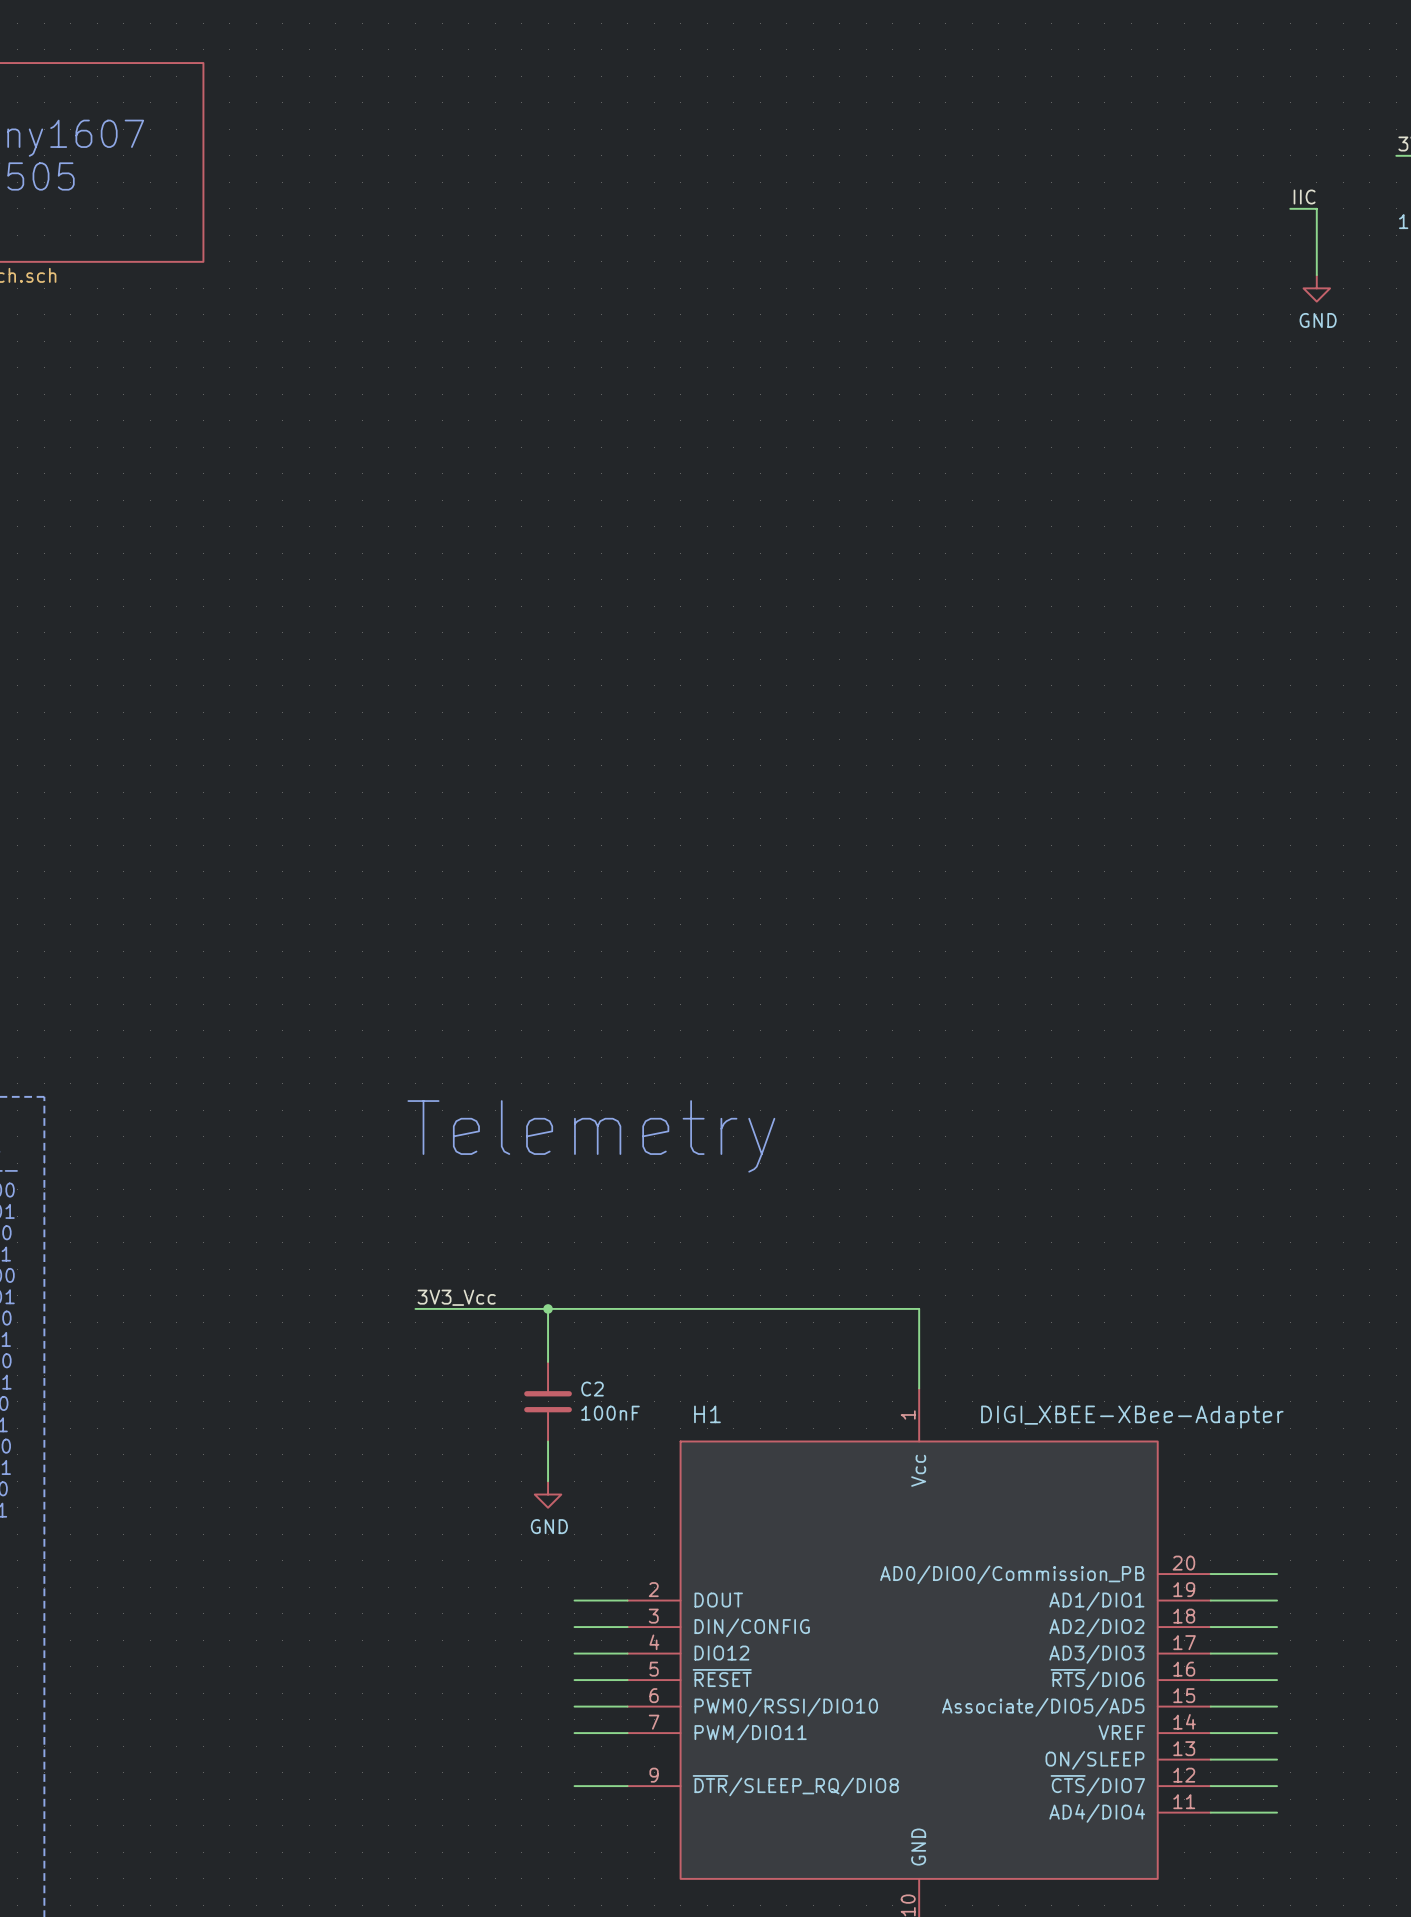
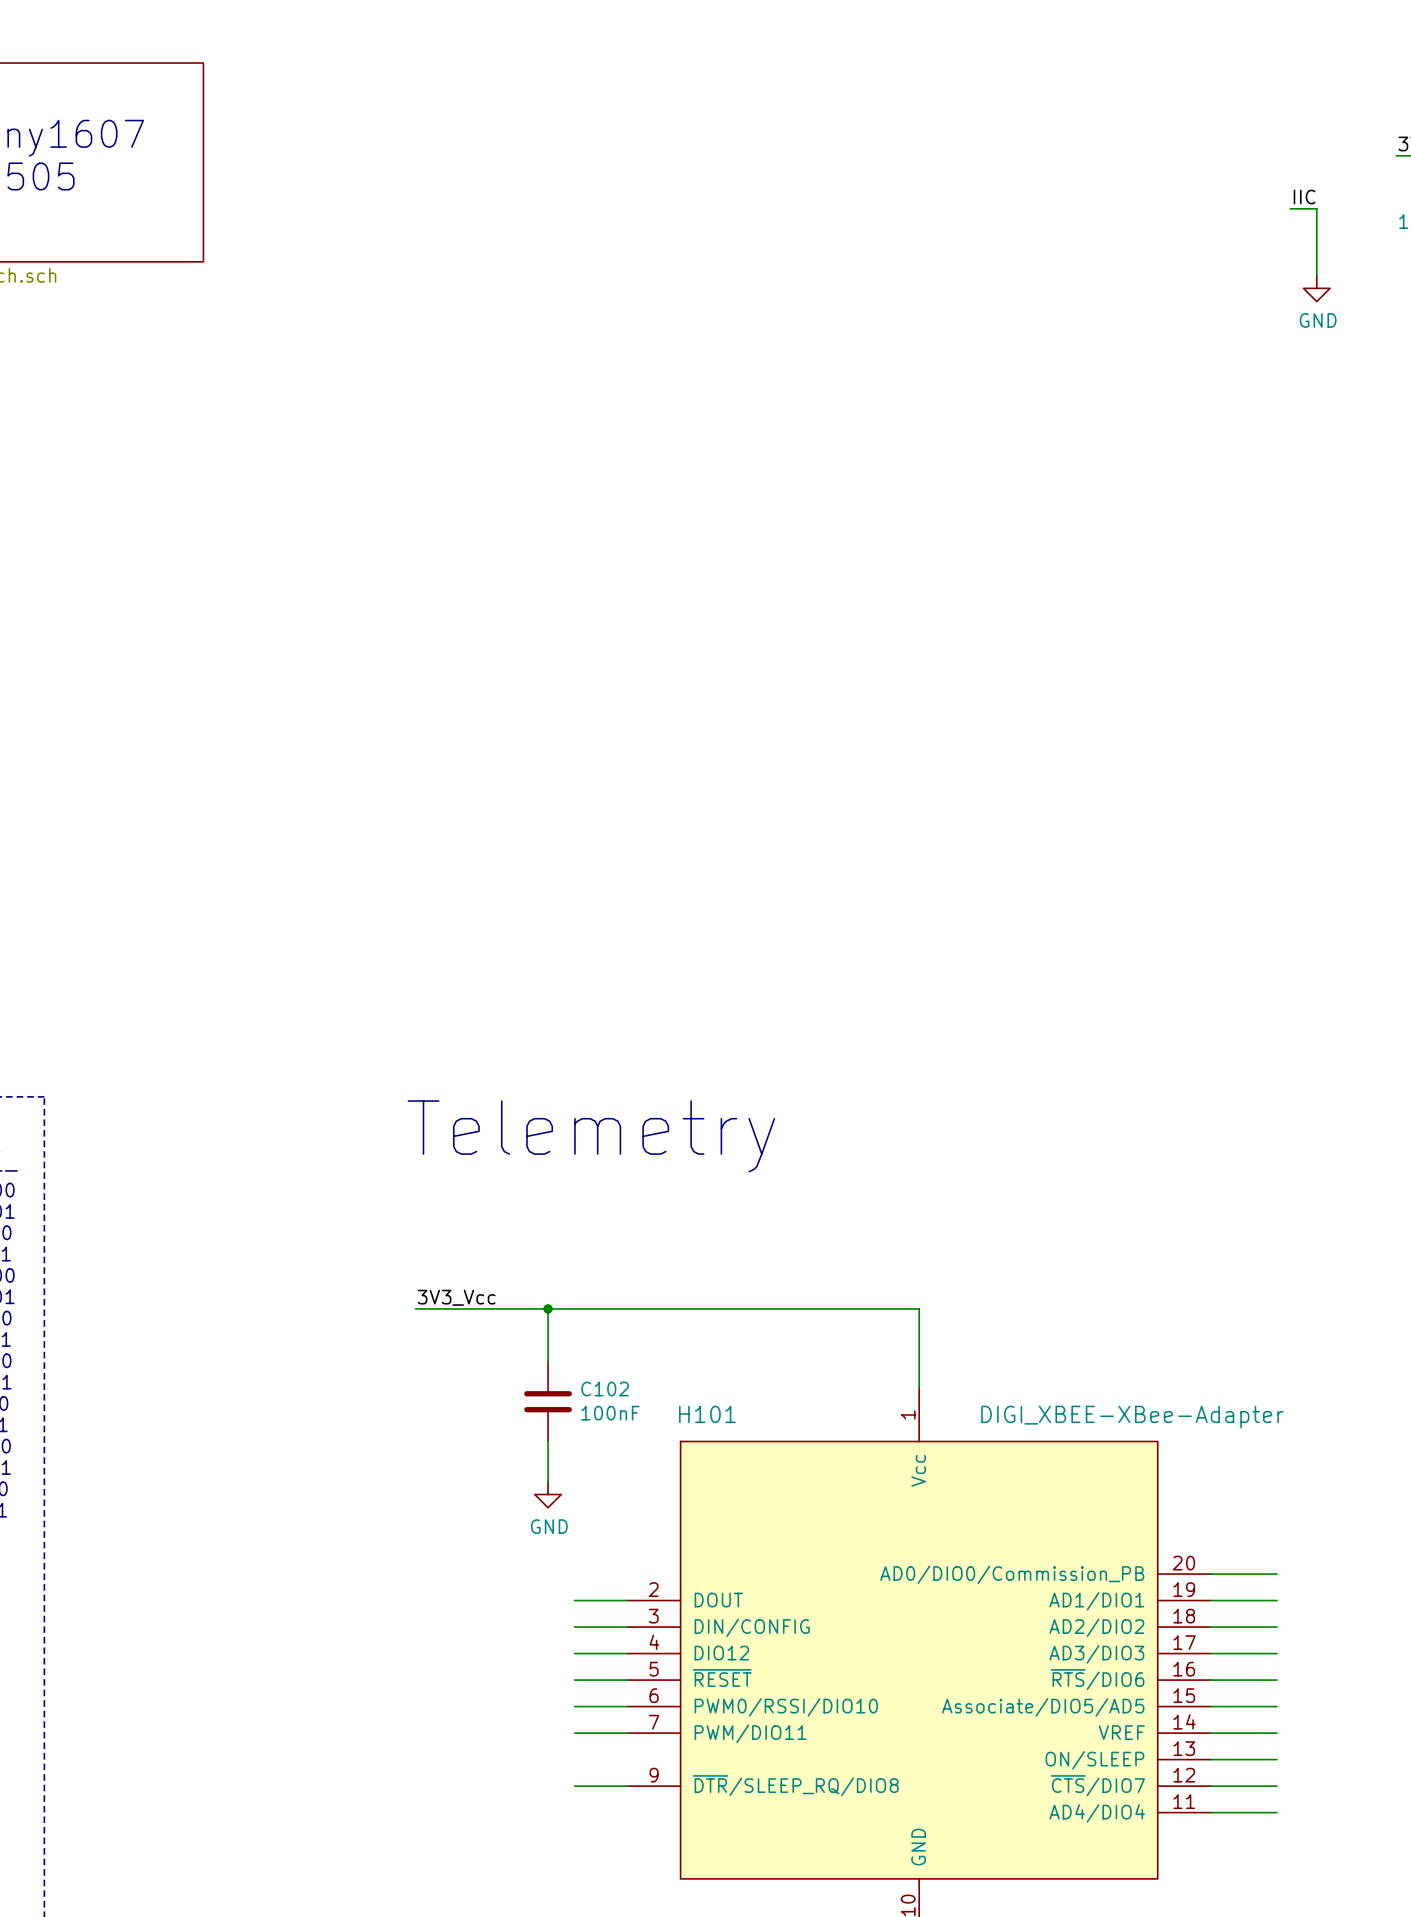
C2 name: C2 (592, 1389) -> C102 (605, 1389)
H1 name: H1 (707, 1414) -> H101 (707, 1414)

